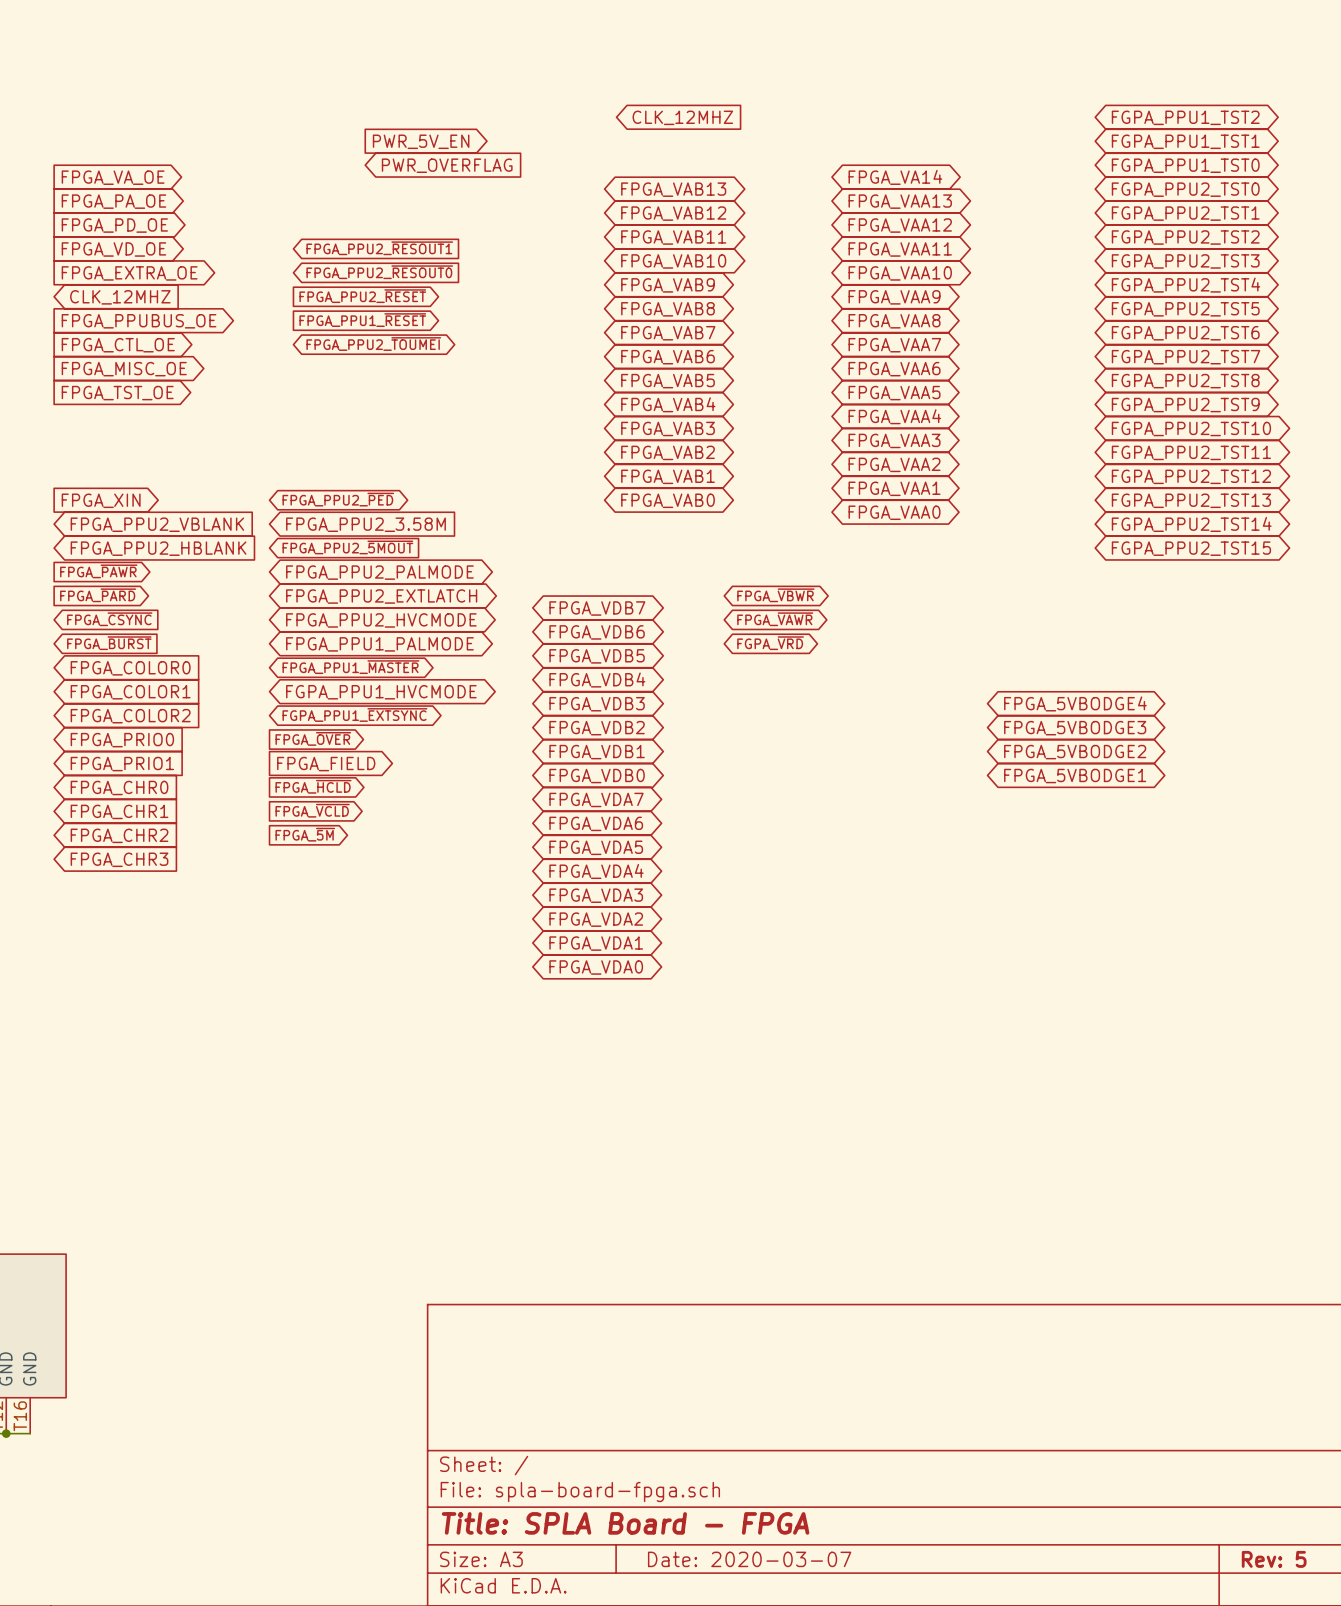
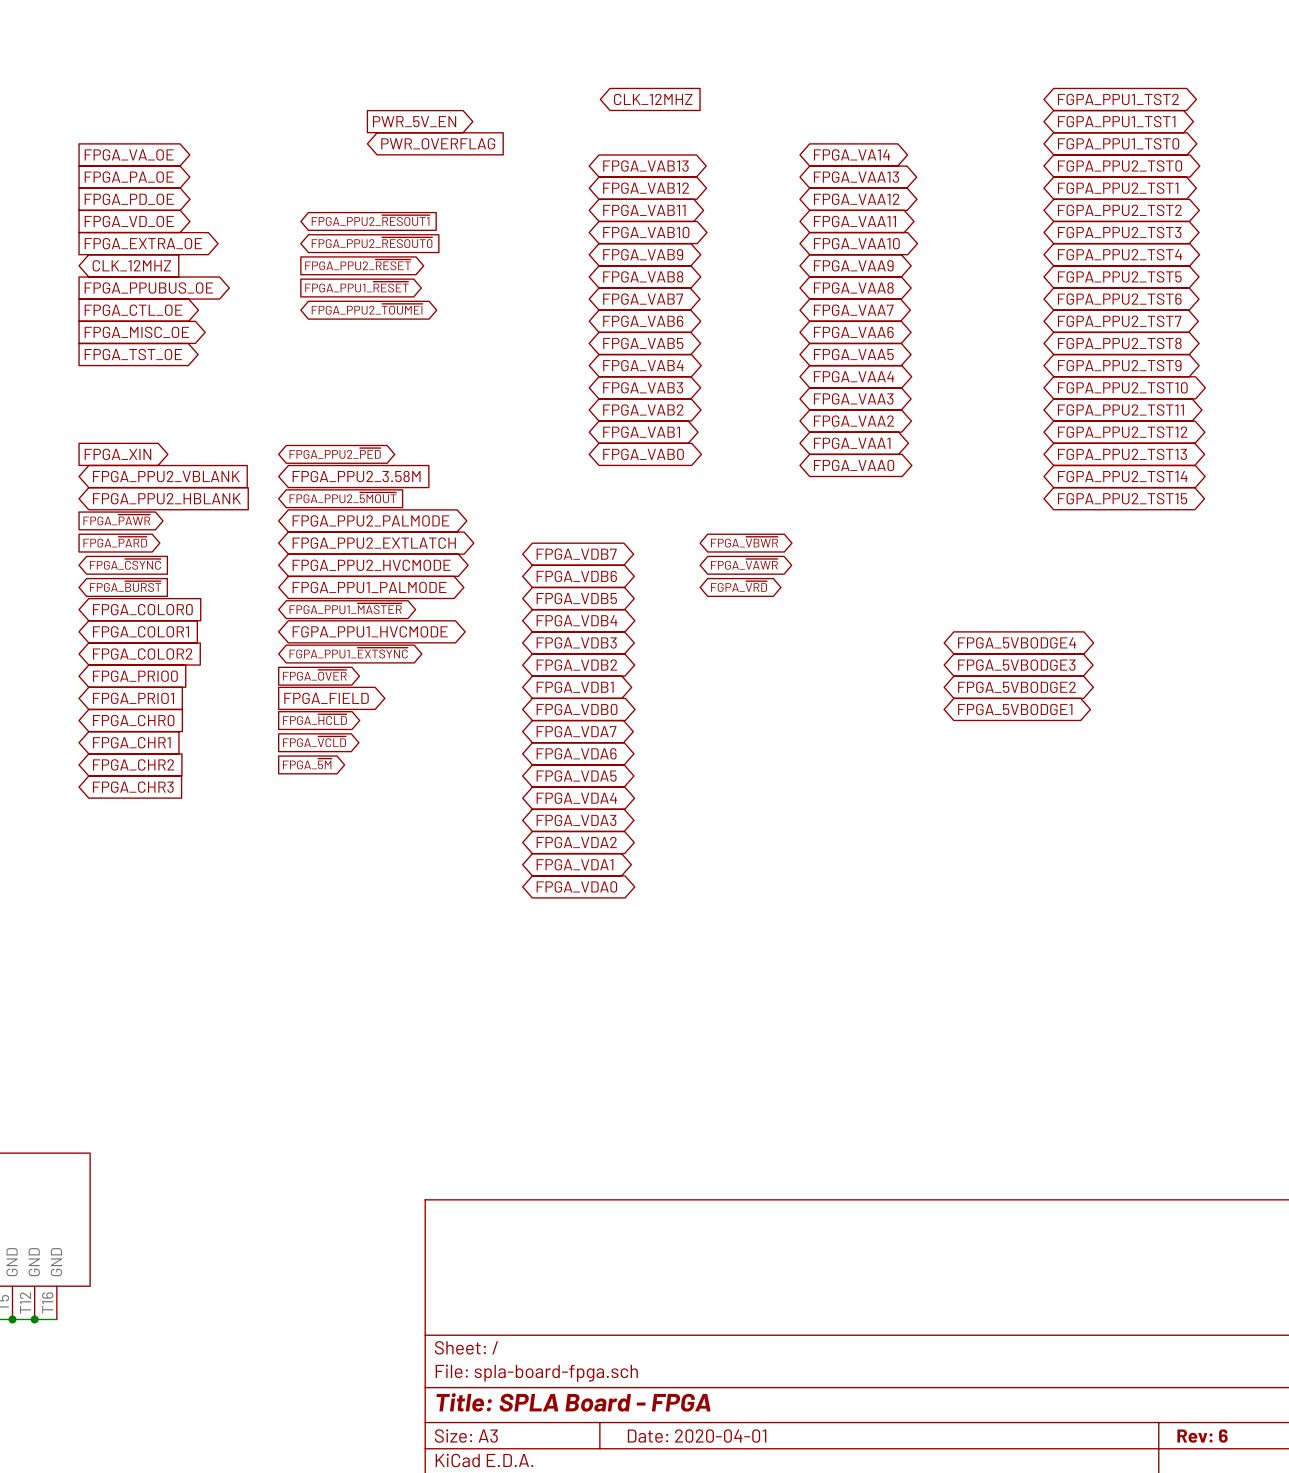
title block: Date: 2020-03-07 (749, 1559) -> Date: 2020-04-01 (697, 1436)
title block: Rev: 5 (1274, 1559) -> Rev: 6 (1202, 1436)

